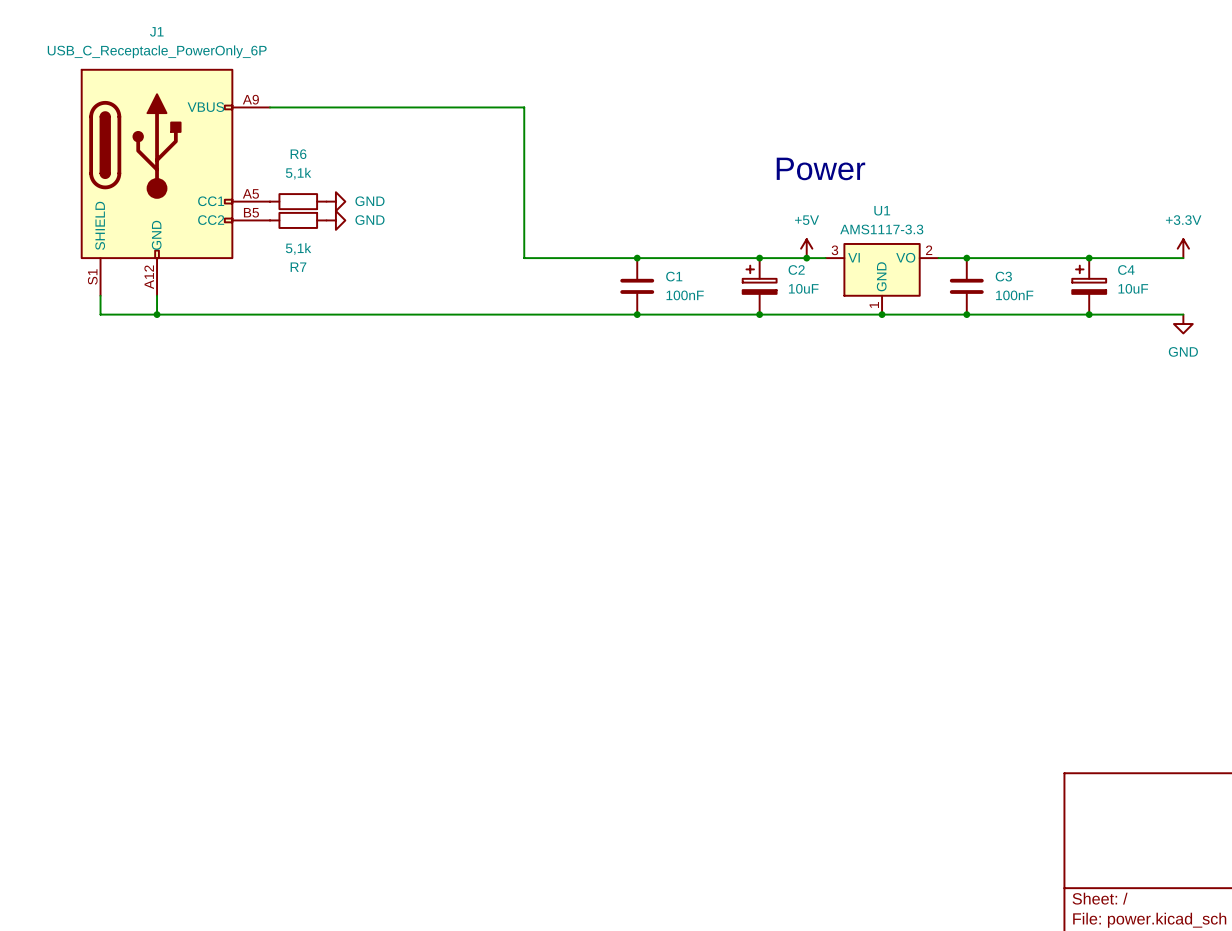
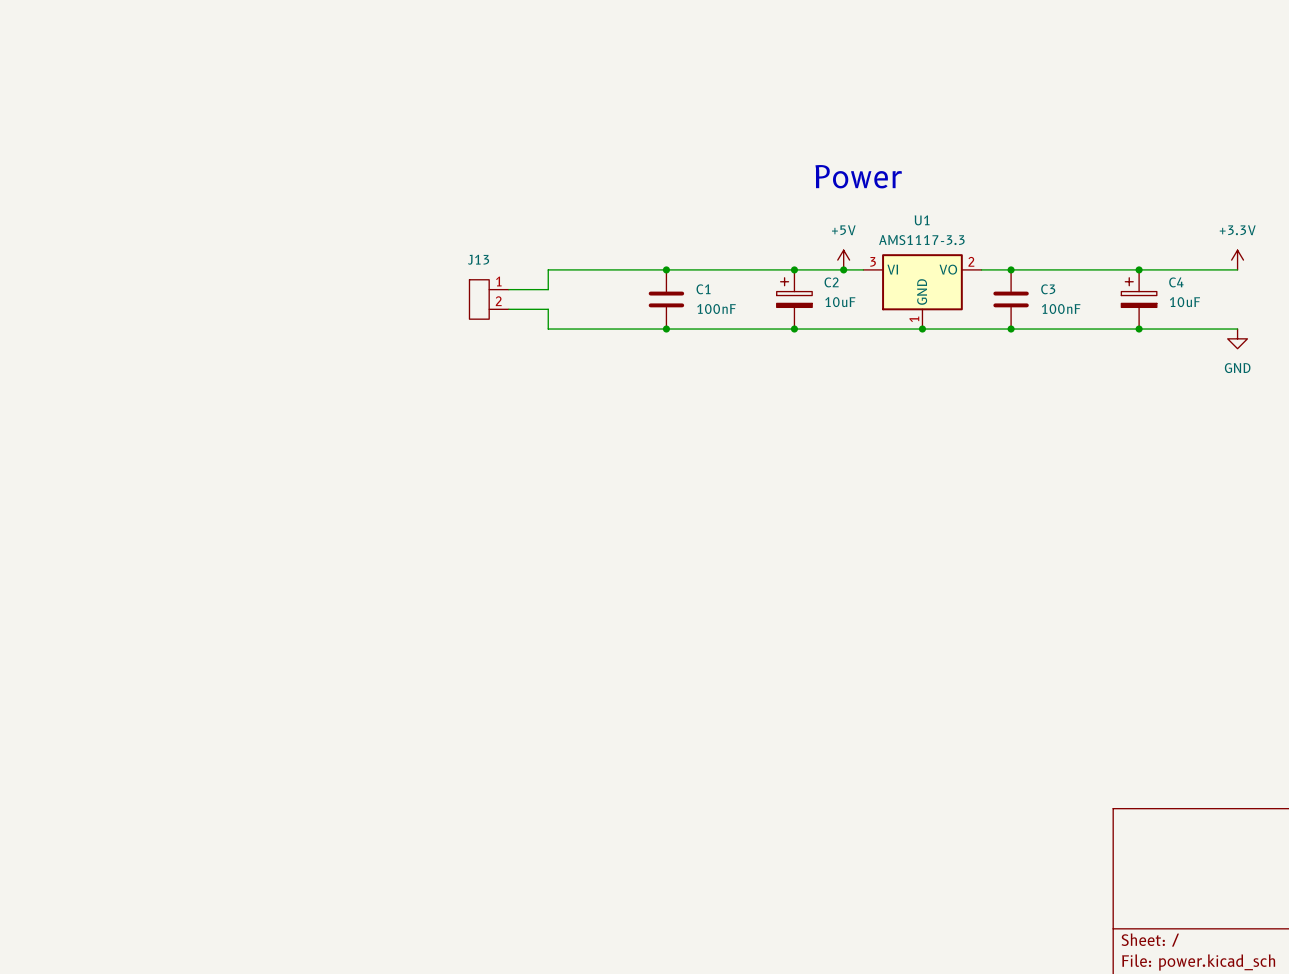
wire: (270, 107) (524, 107) (524, 258) -> (508, 289) (548, 289) (548, 269)
J1: USB_C_Receptacle_PowerOnly_6P (175, 182) -> none
R6: 5,1k (298, 201) -> none
power symbol: GND (335, 201) -> none
R7: 5,1k (298, 220) -> none
power symbol: GND (335, 220) -> none
J13: none -> (489, 299)
wire: (100, 295) (100, 314) (524, 314) -> (508, 309) (548, 309) (548, 329)
wire: (157, 295) (157, 314) -> none
junction: (157, 314) -> none

